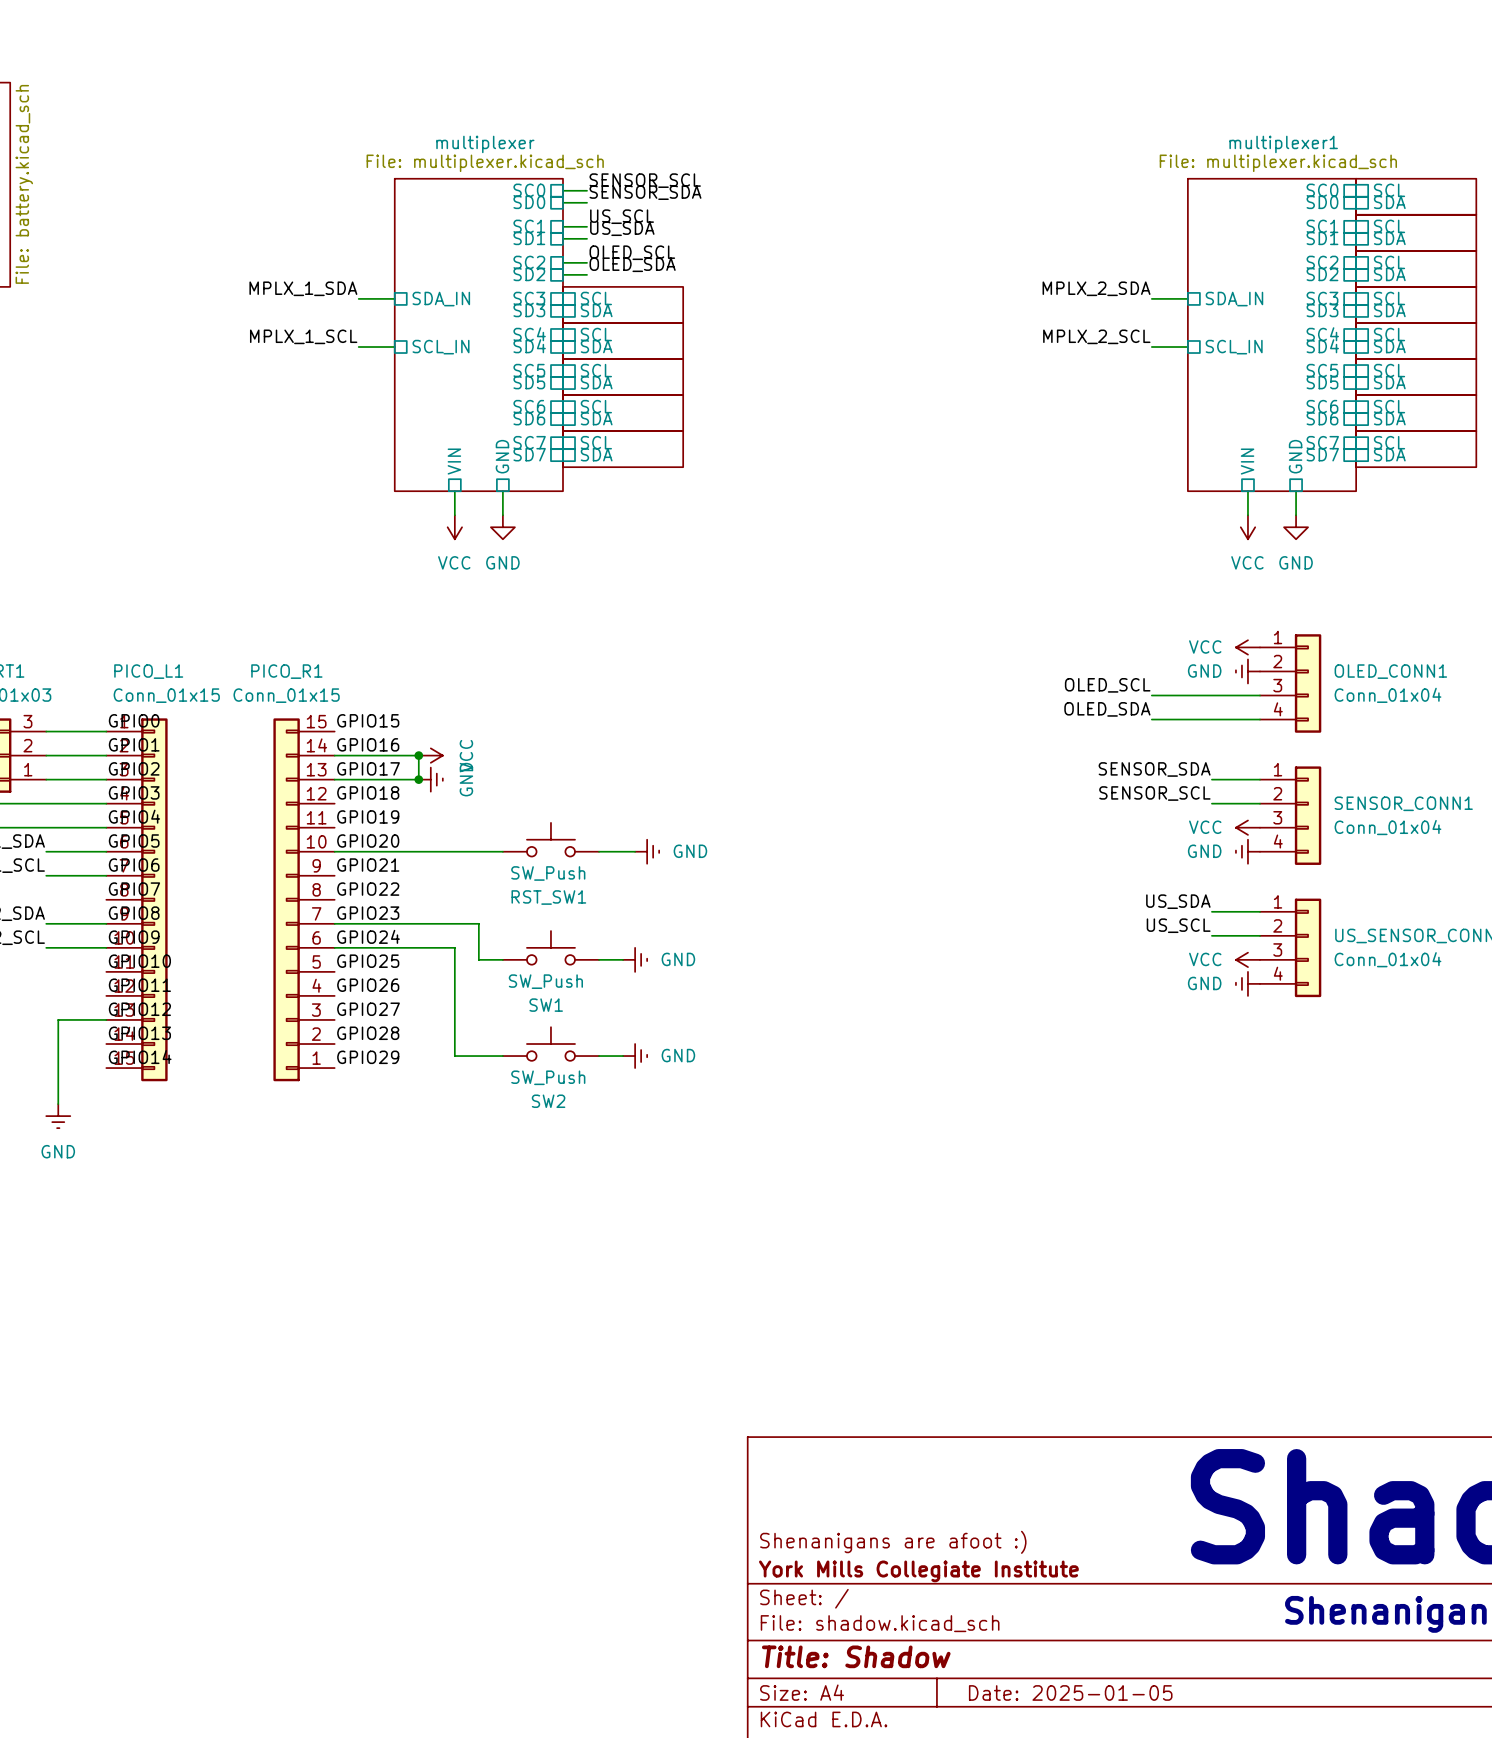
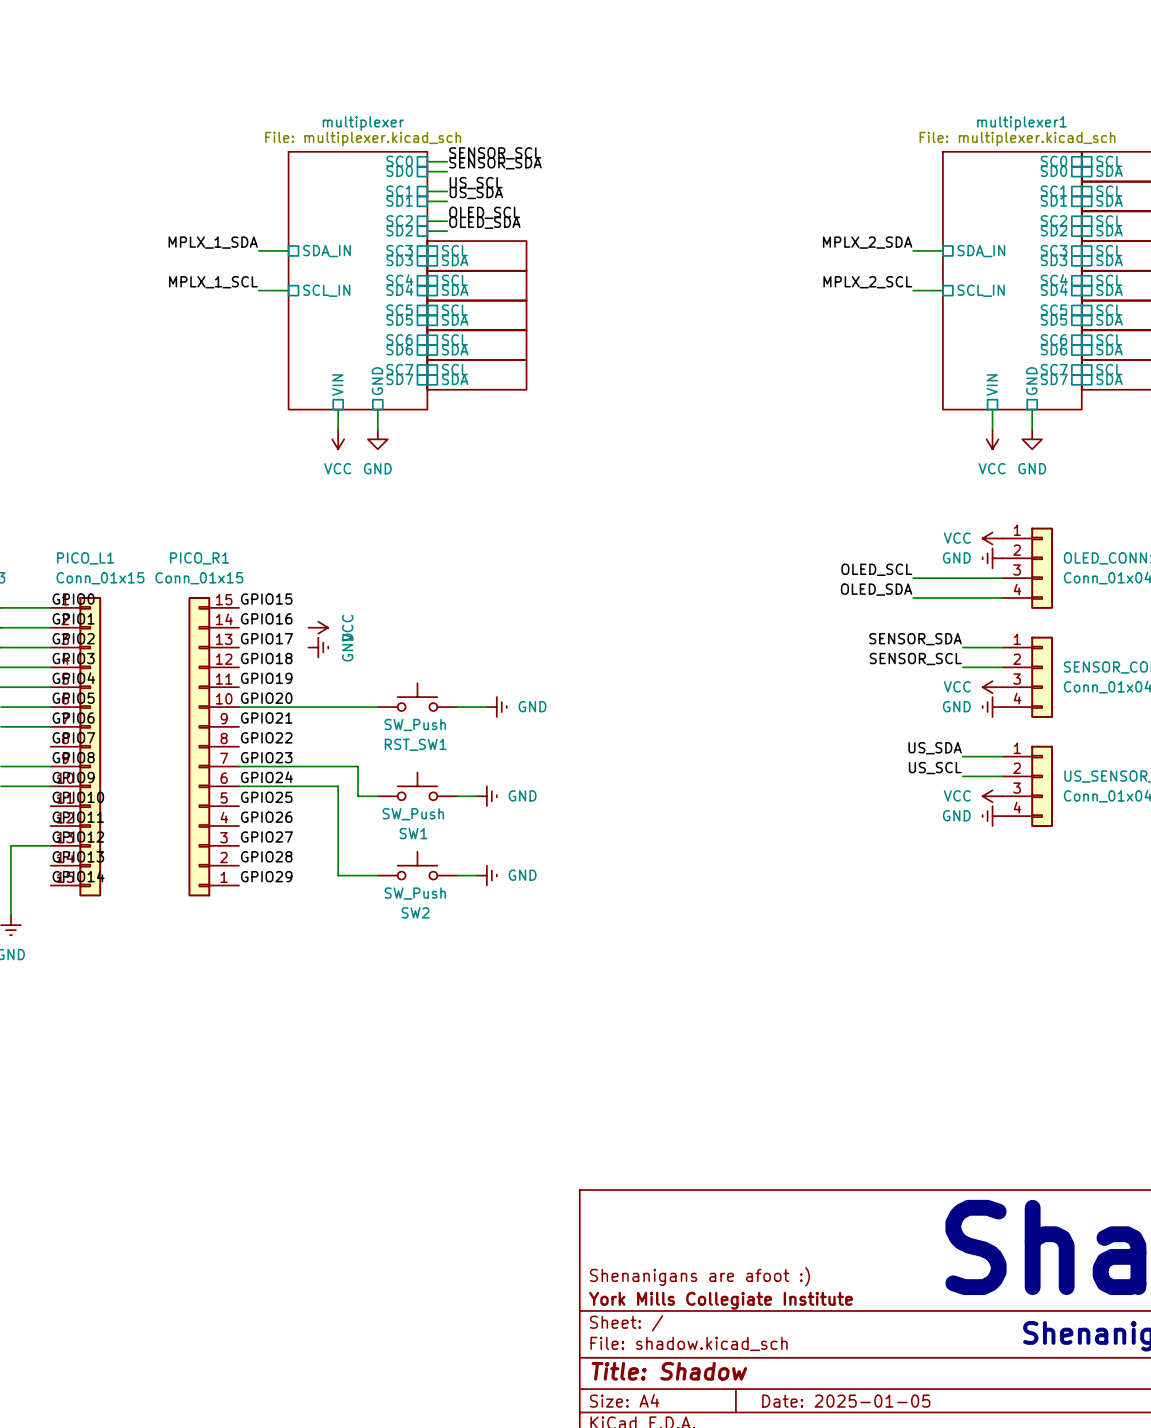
wire: (334, 755) (418, 755) (418, 779) (334, 779) -> none
junction: (418, 755) -> none
junction: (418, 779) -> none

